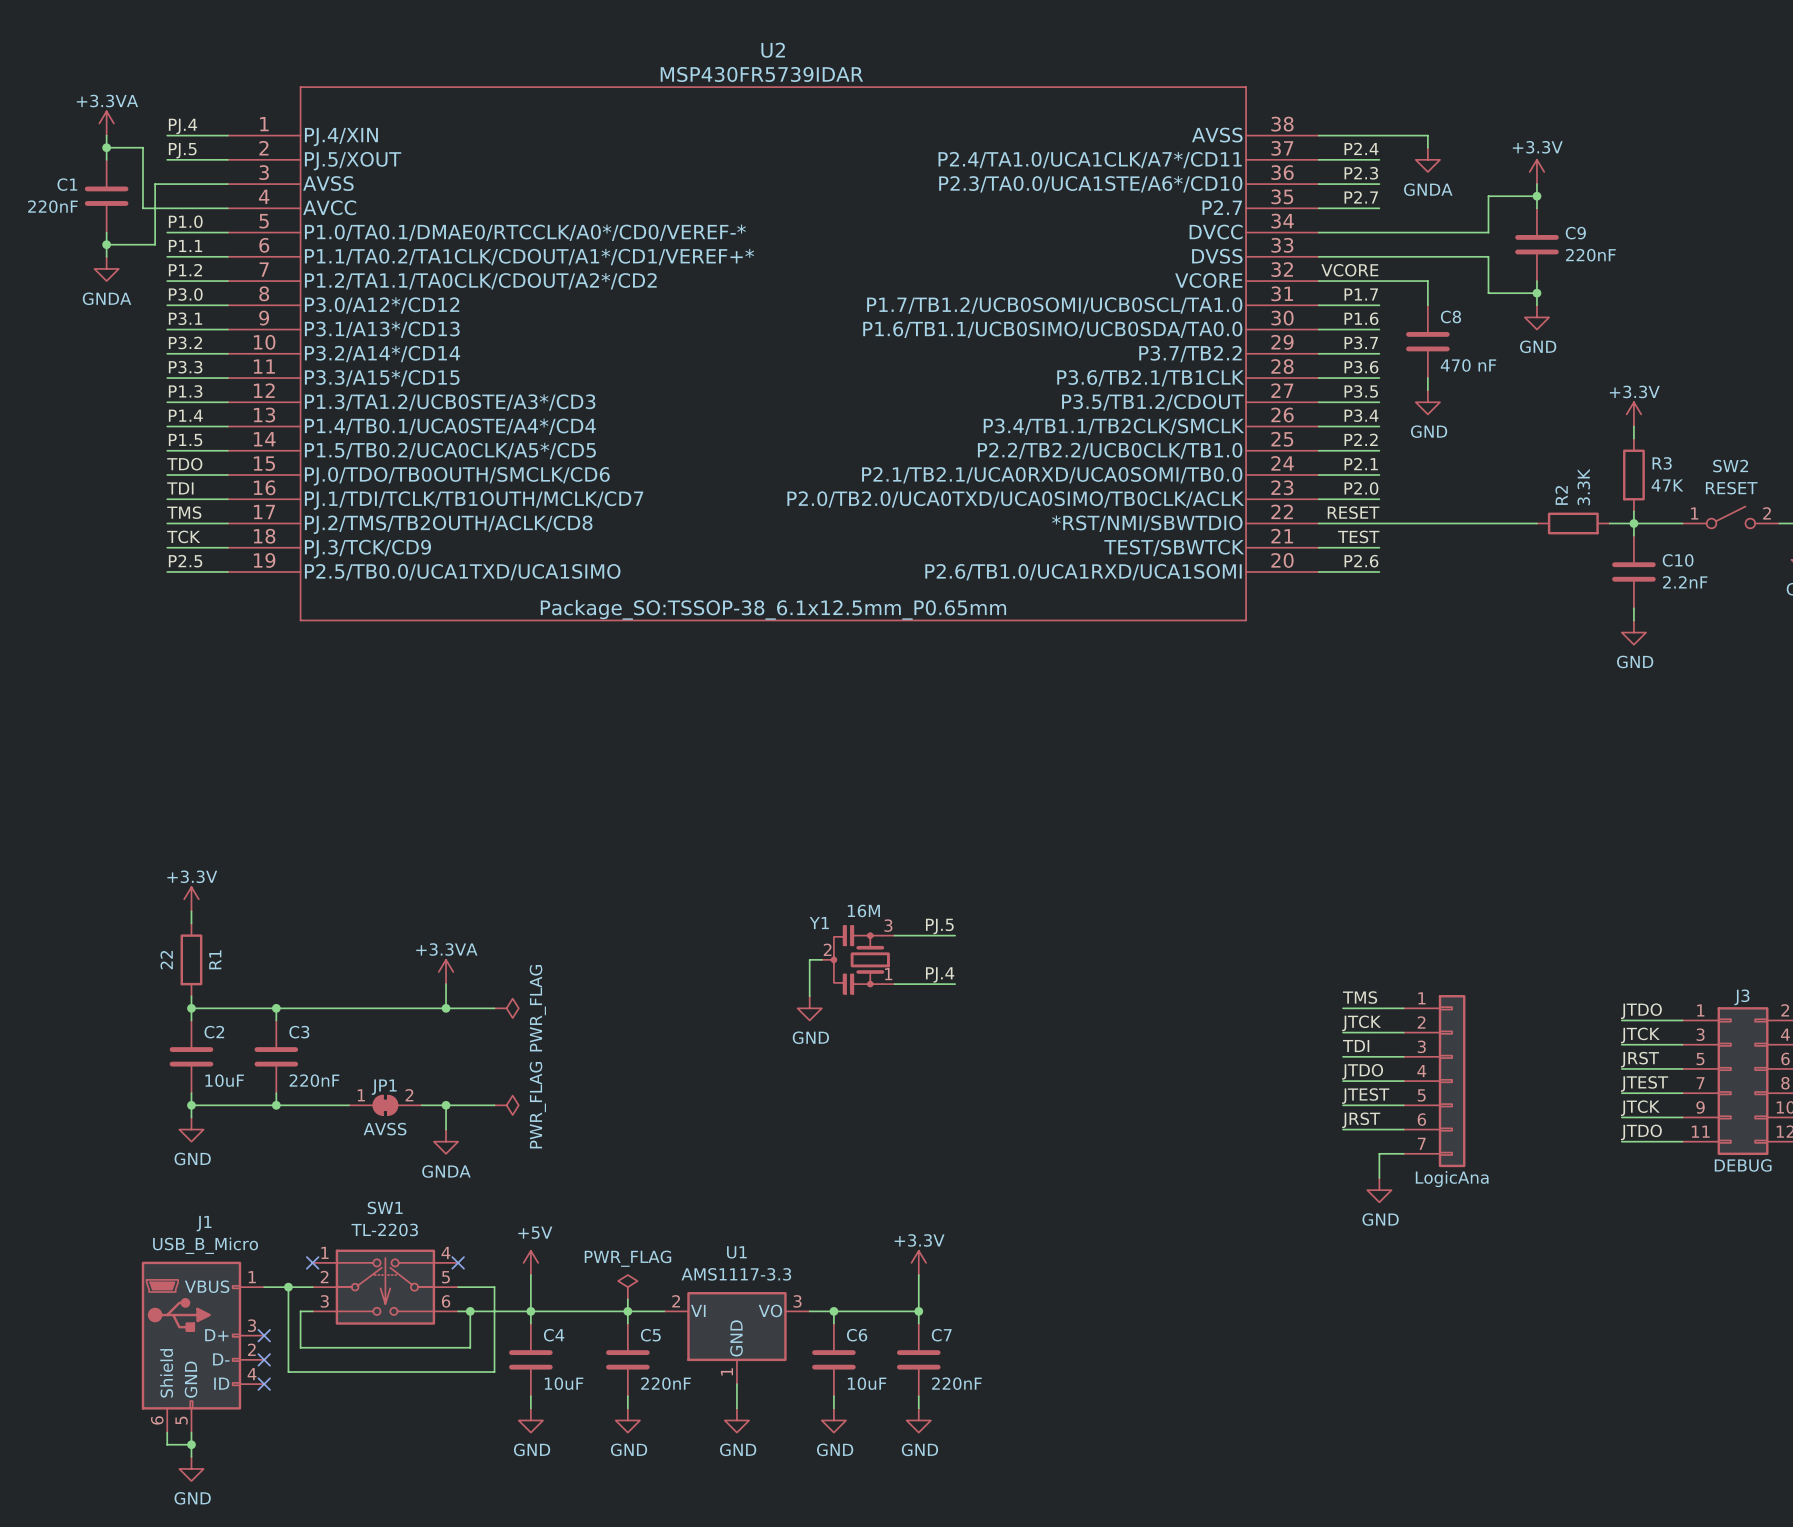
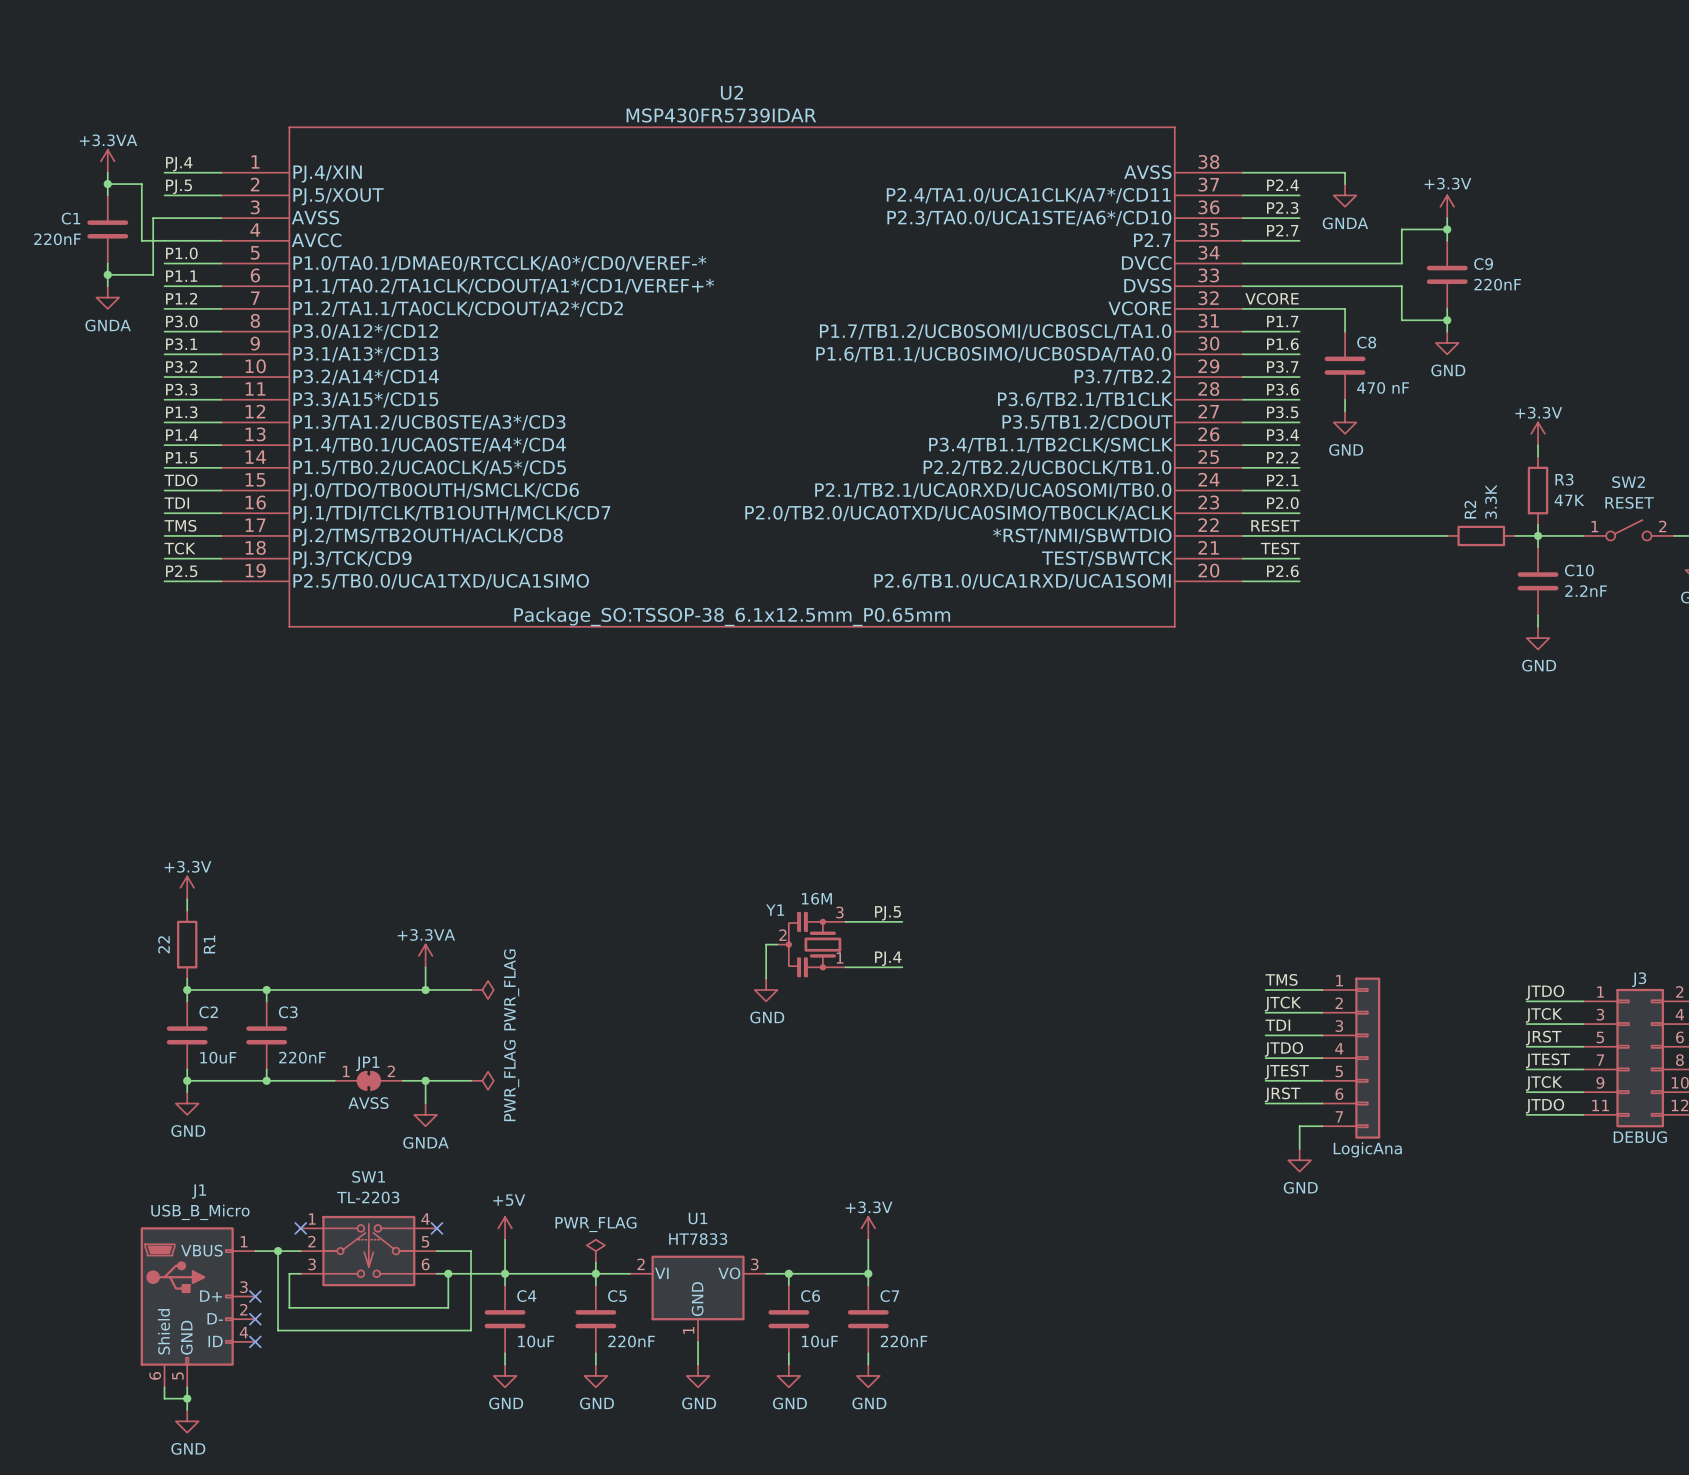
U1 value: AMS1117-3.3 (736, 1274) -> HT7833 (698, 1239)

